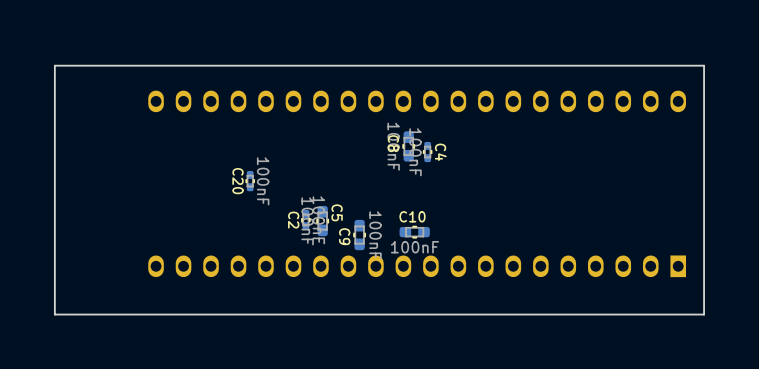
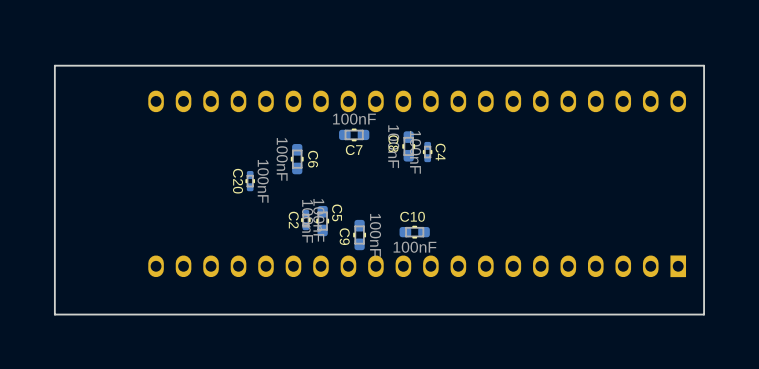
C7: none -> 100nF (354, 134)
C6: none -> 100nF (297, 159)

